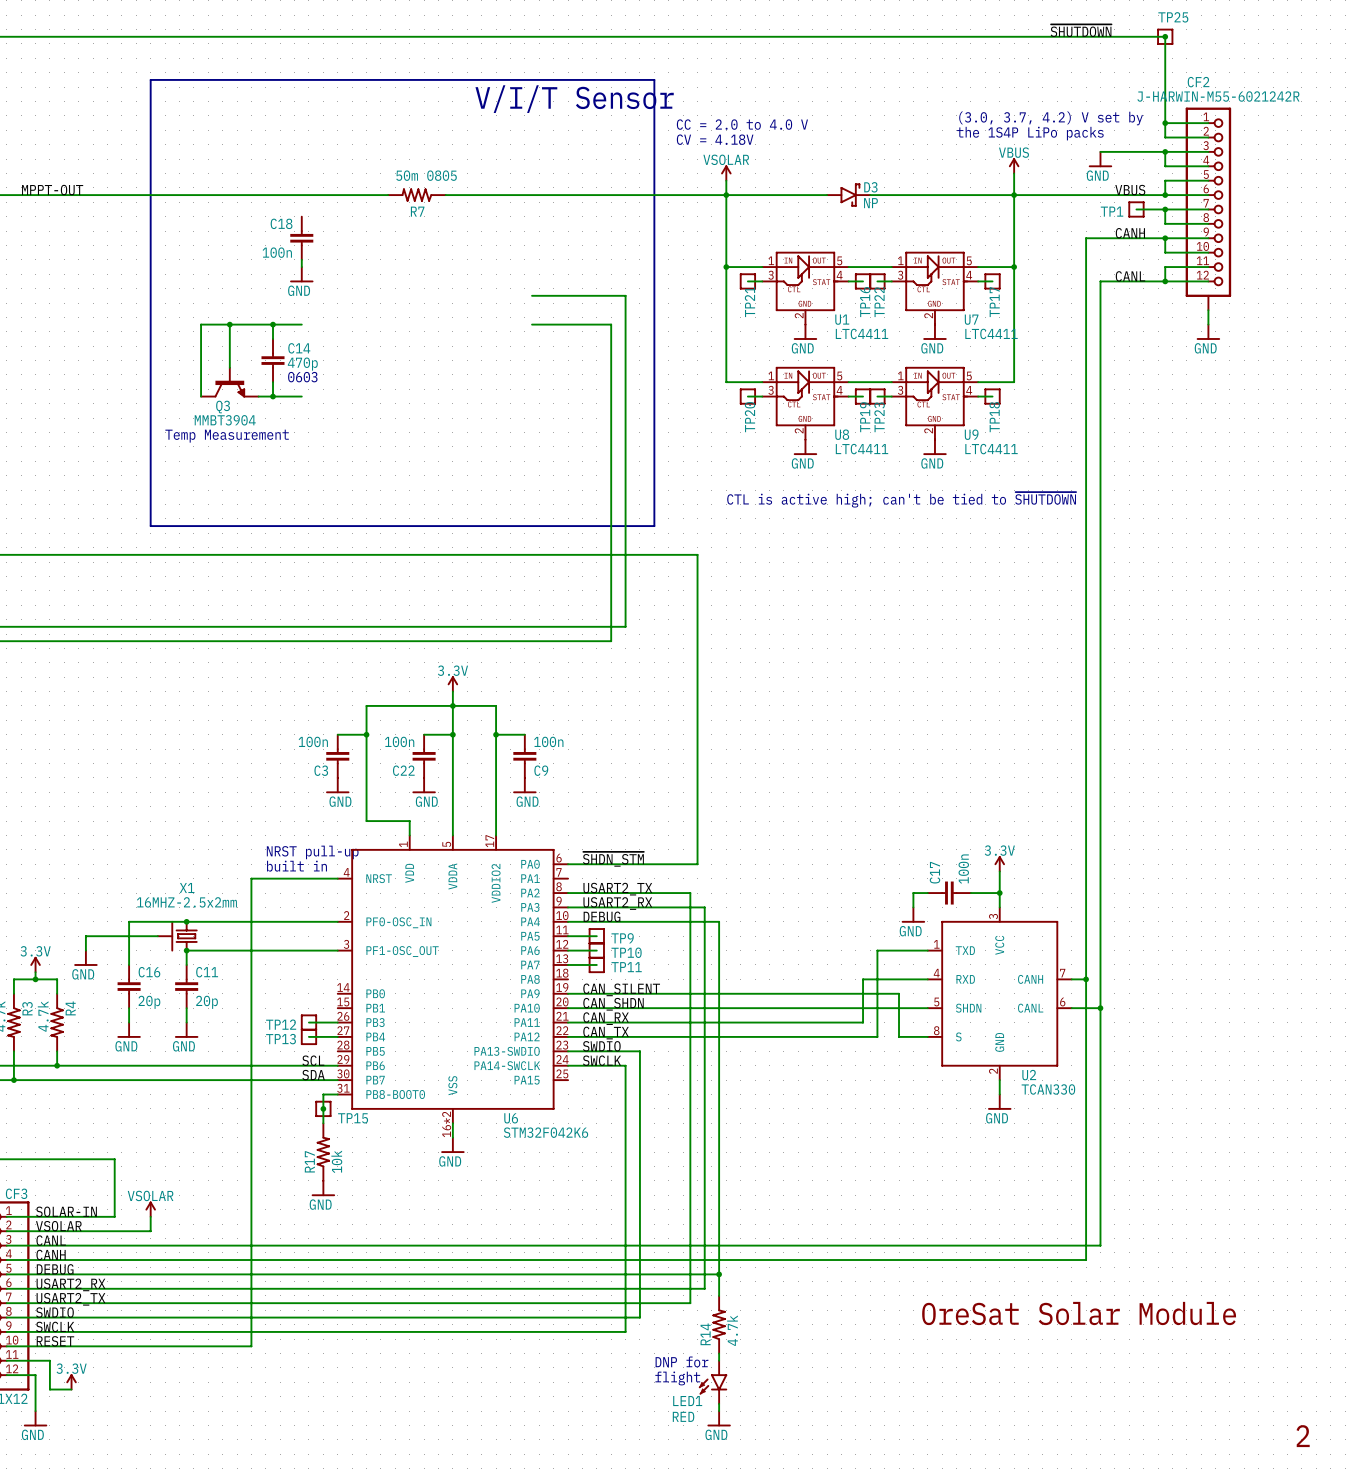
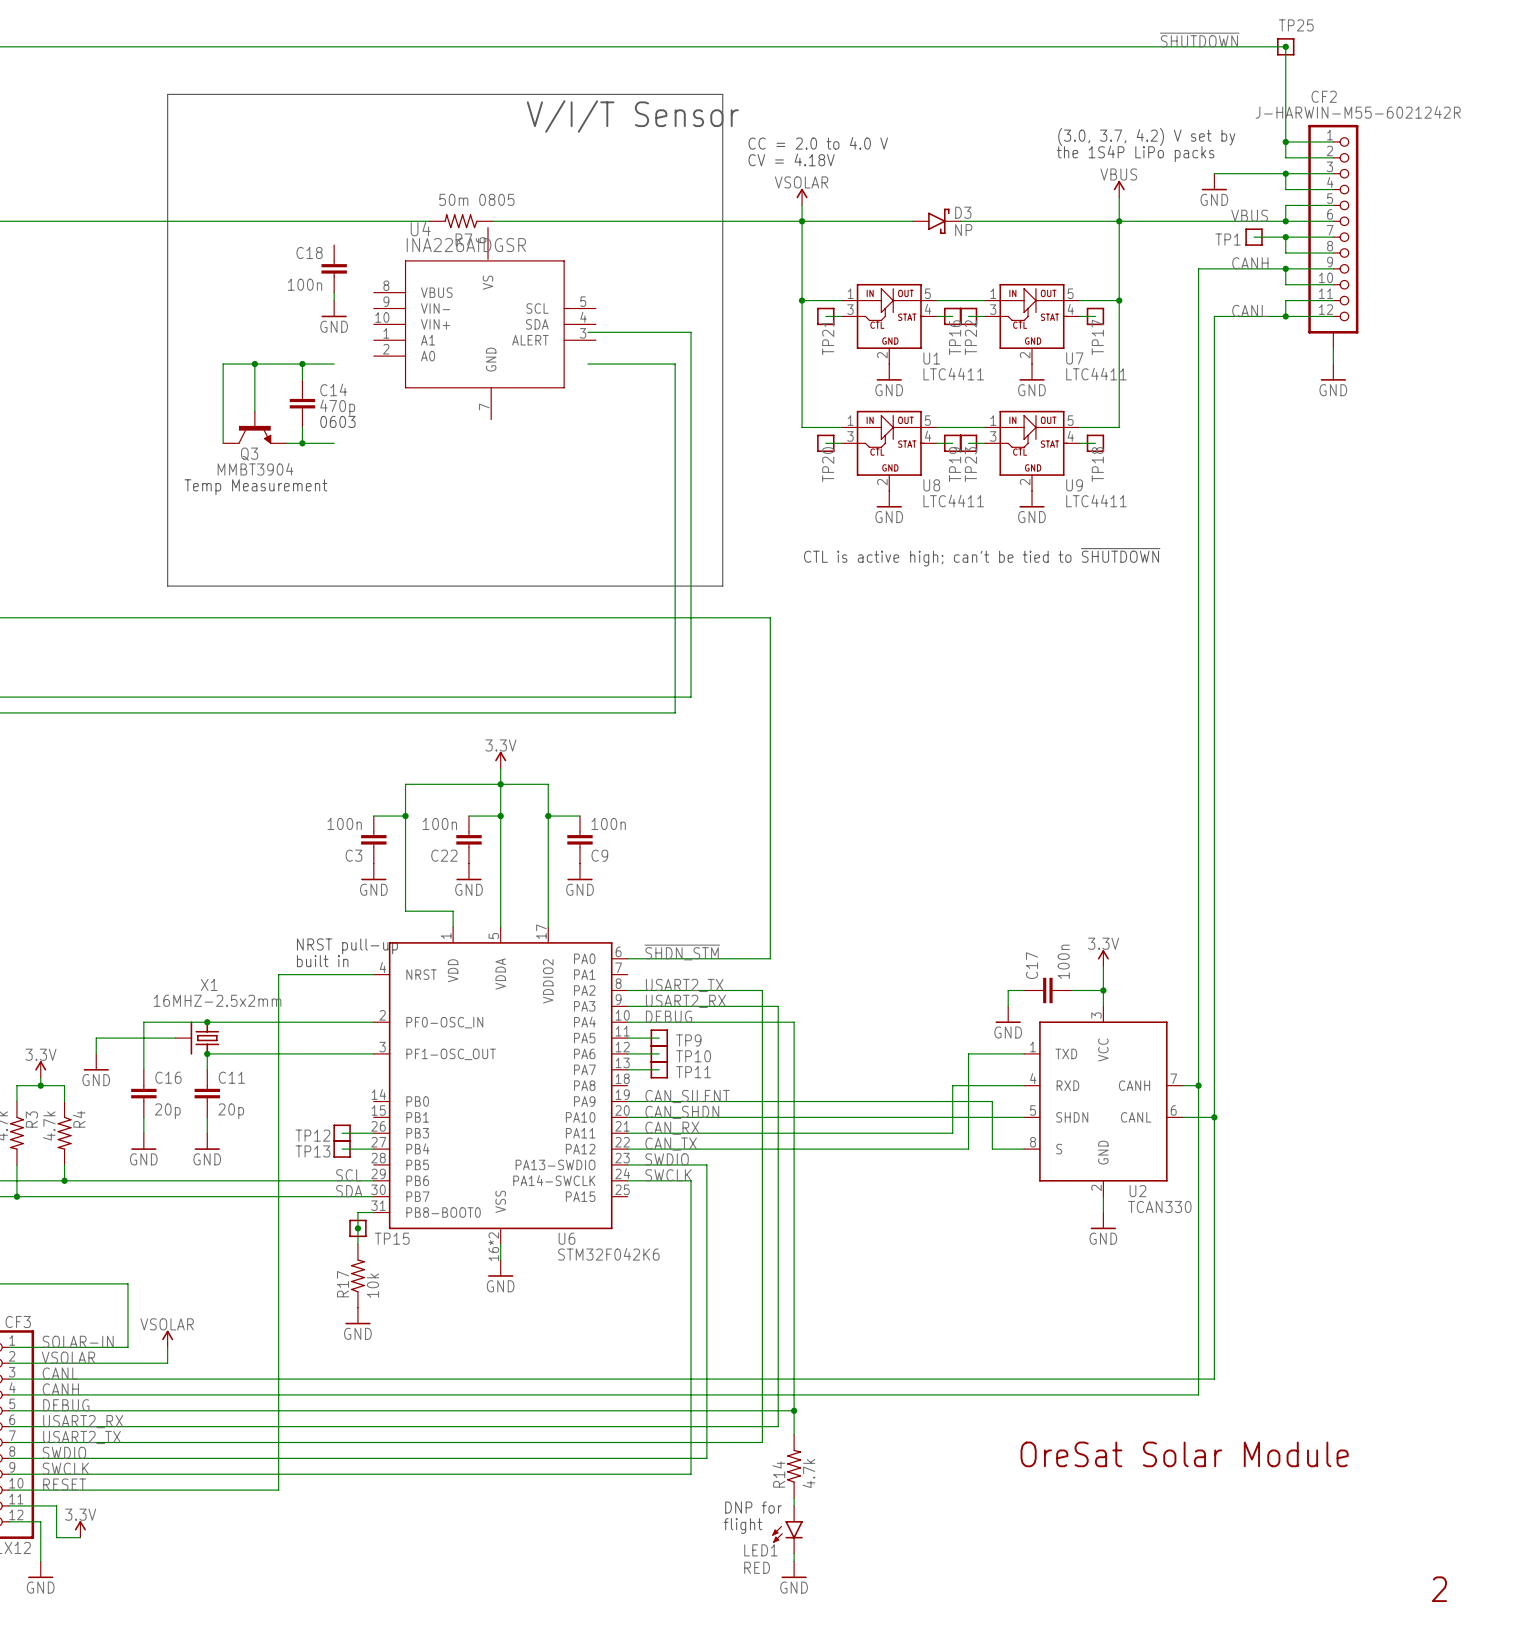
label: MPPT-OUT (52, 190) -> none
U4: none -> INA226AIDGSR (484, 323)

